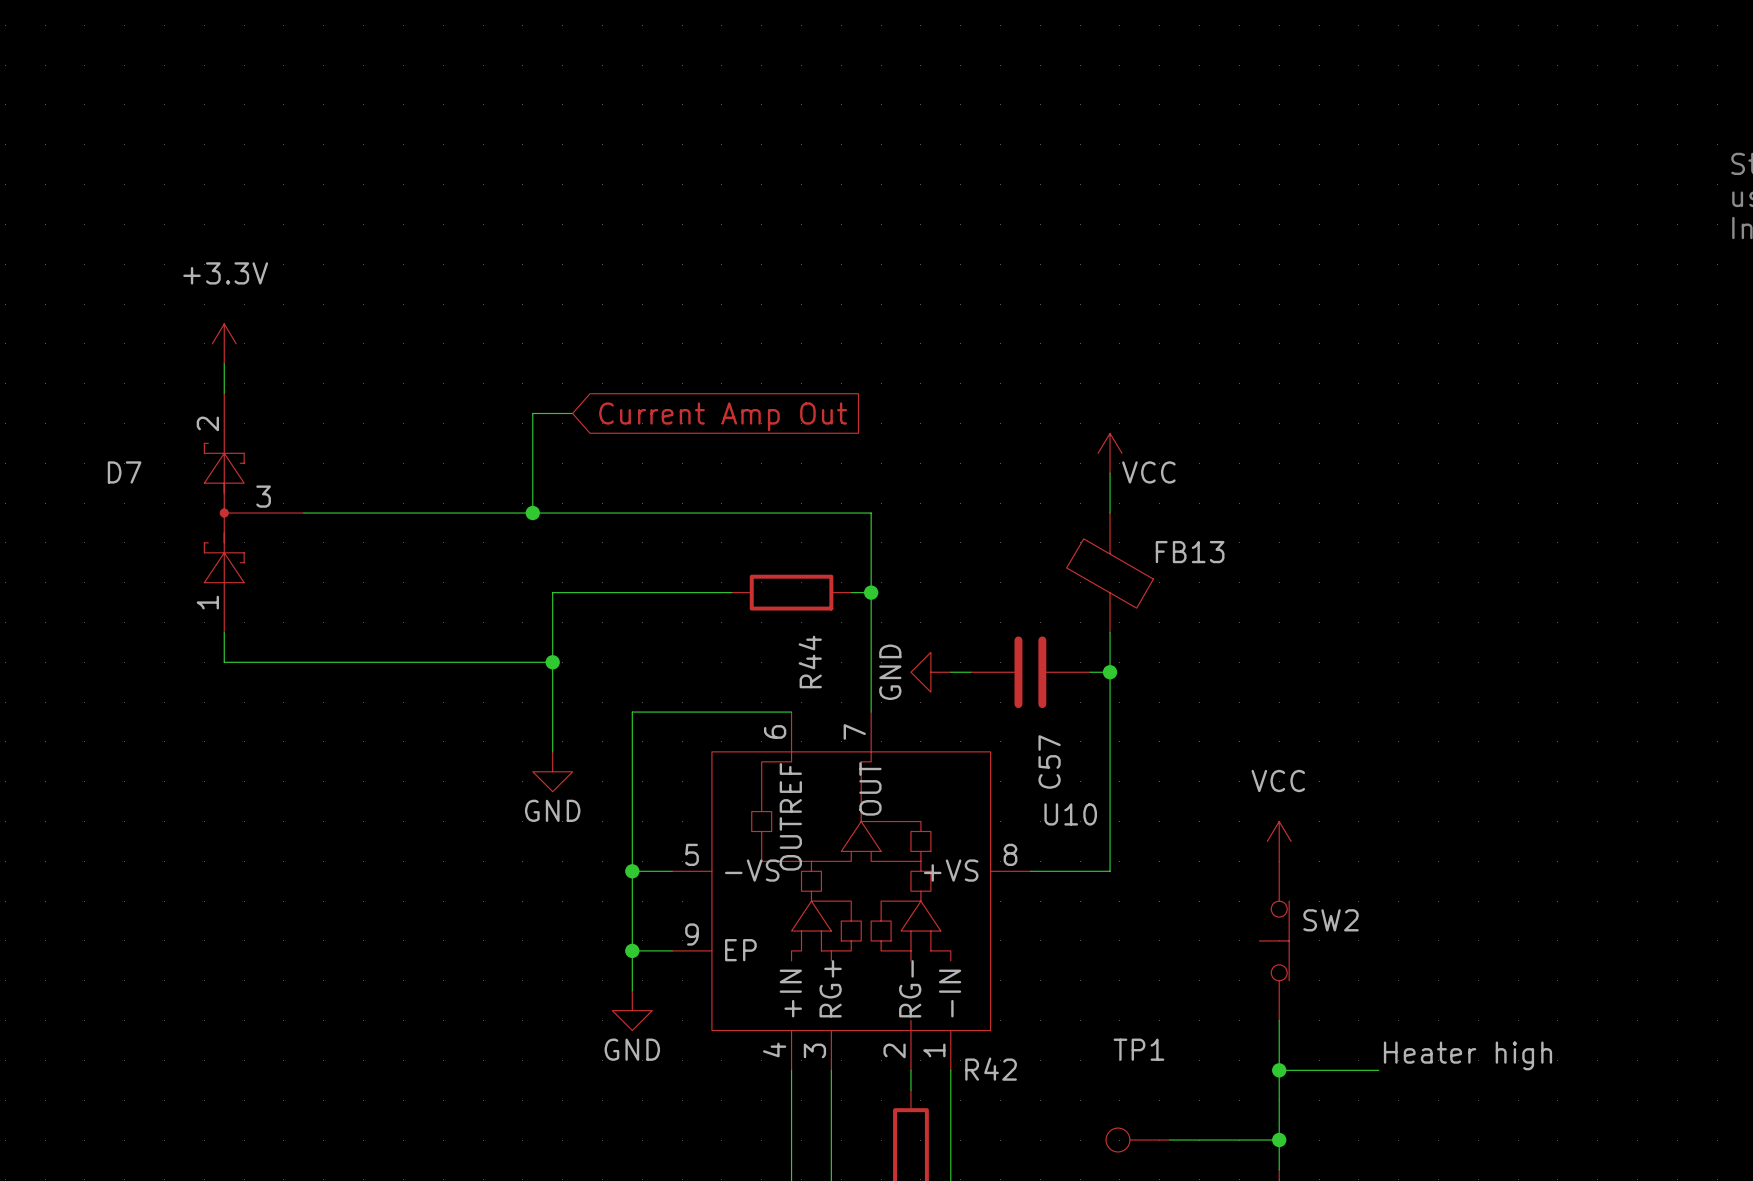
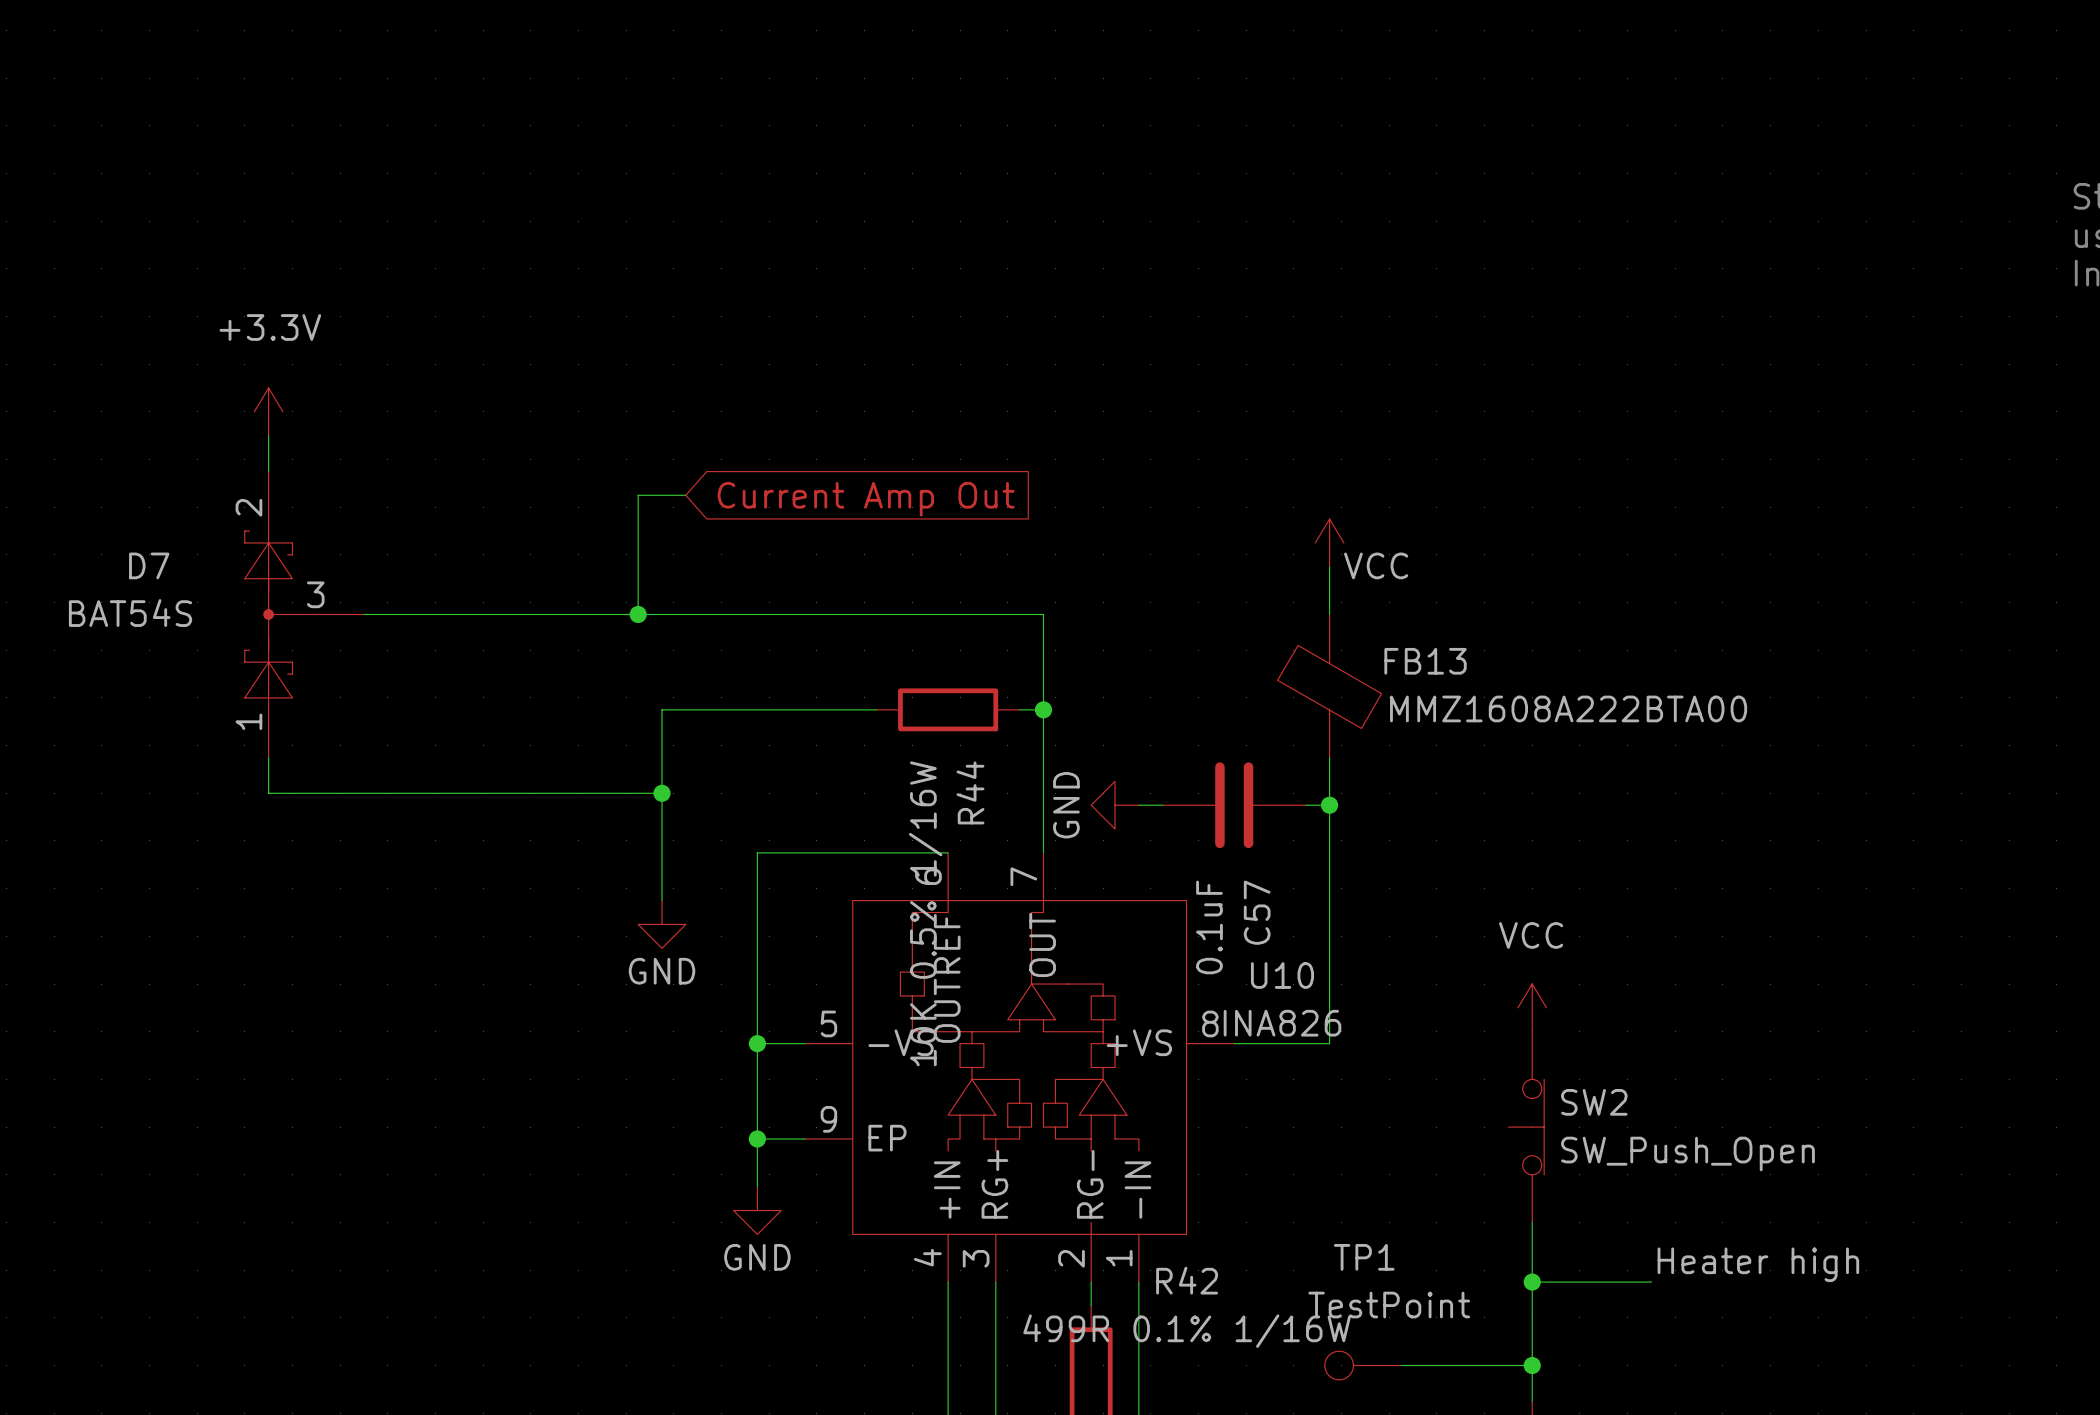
D7 value: none -> BAT54S (130, 613)
FB13 value: none -> MMZ1608A222BTA00 (1568, 708)
R44 value: none -> 10K 0.5% 1/16W (925, 913)
C57 value: none -> 0.1uF (1209, 927)
U10 value: none -> INA826 (1282, 1023)
SW2 value: none -> SW_Push_Open (1687, 1154)
TP1 value: none -> TestPoint (1389, 1305)
R42 value: none -> 499R 0.1% 1/16W (1187, 1331)

